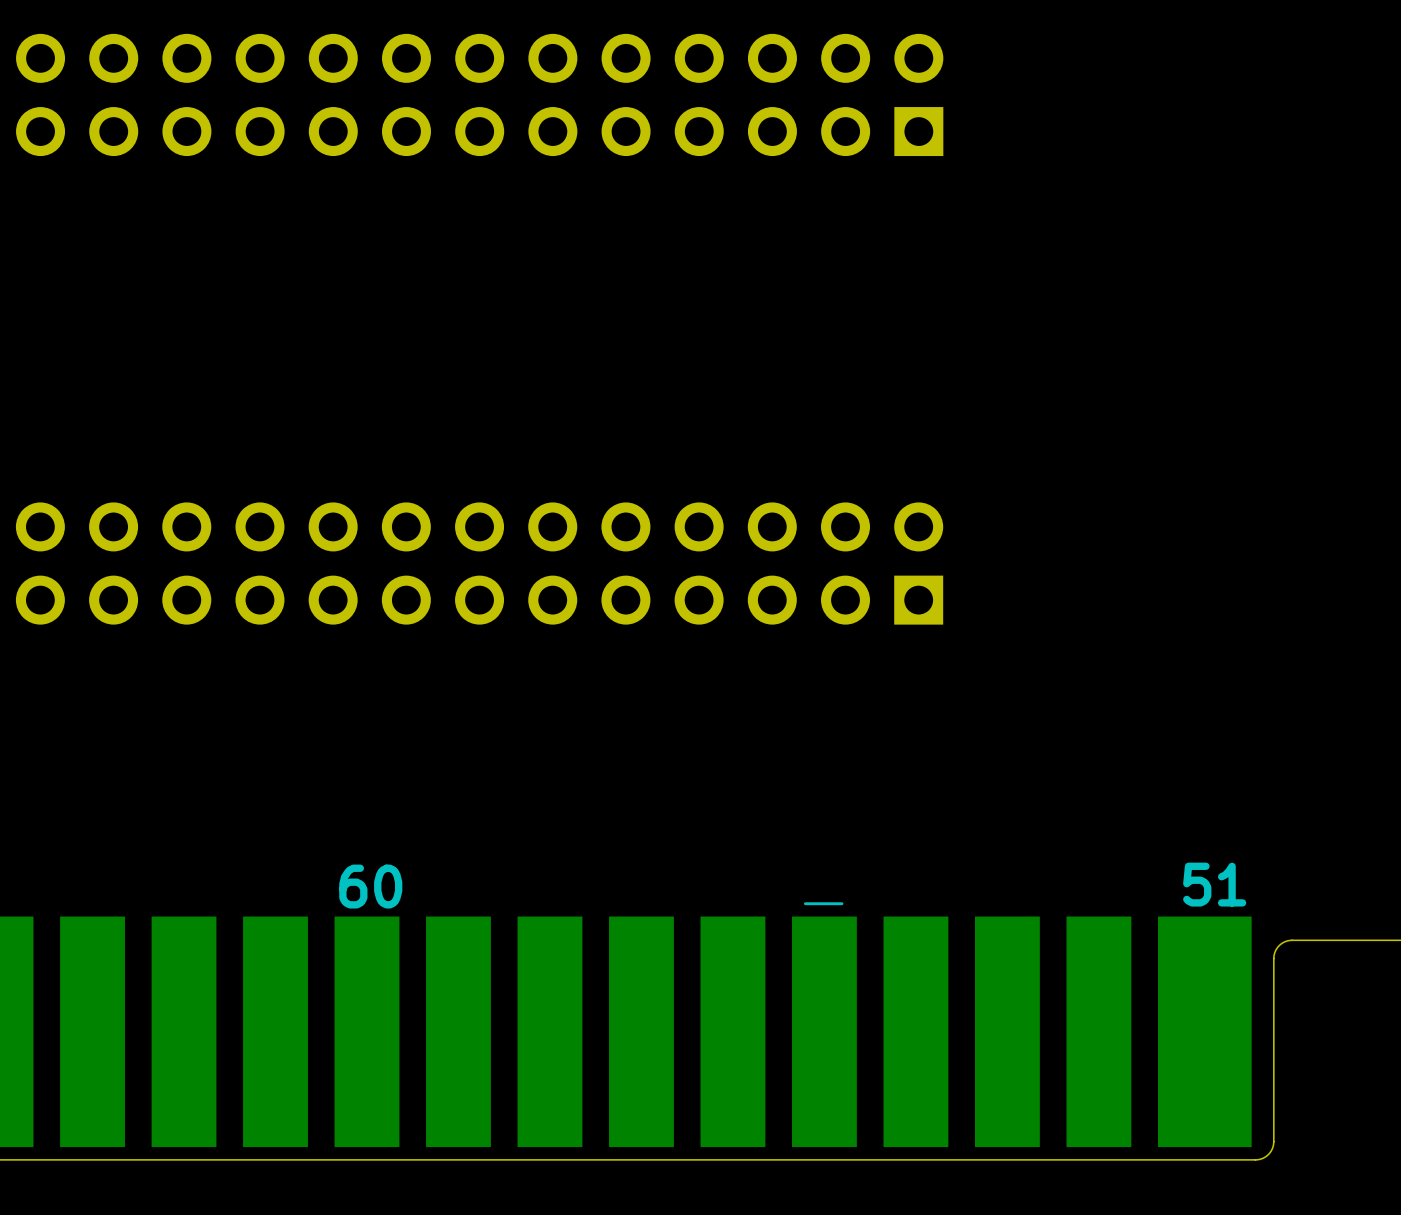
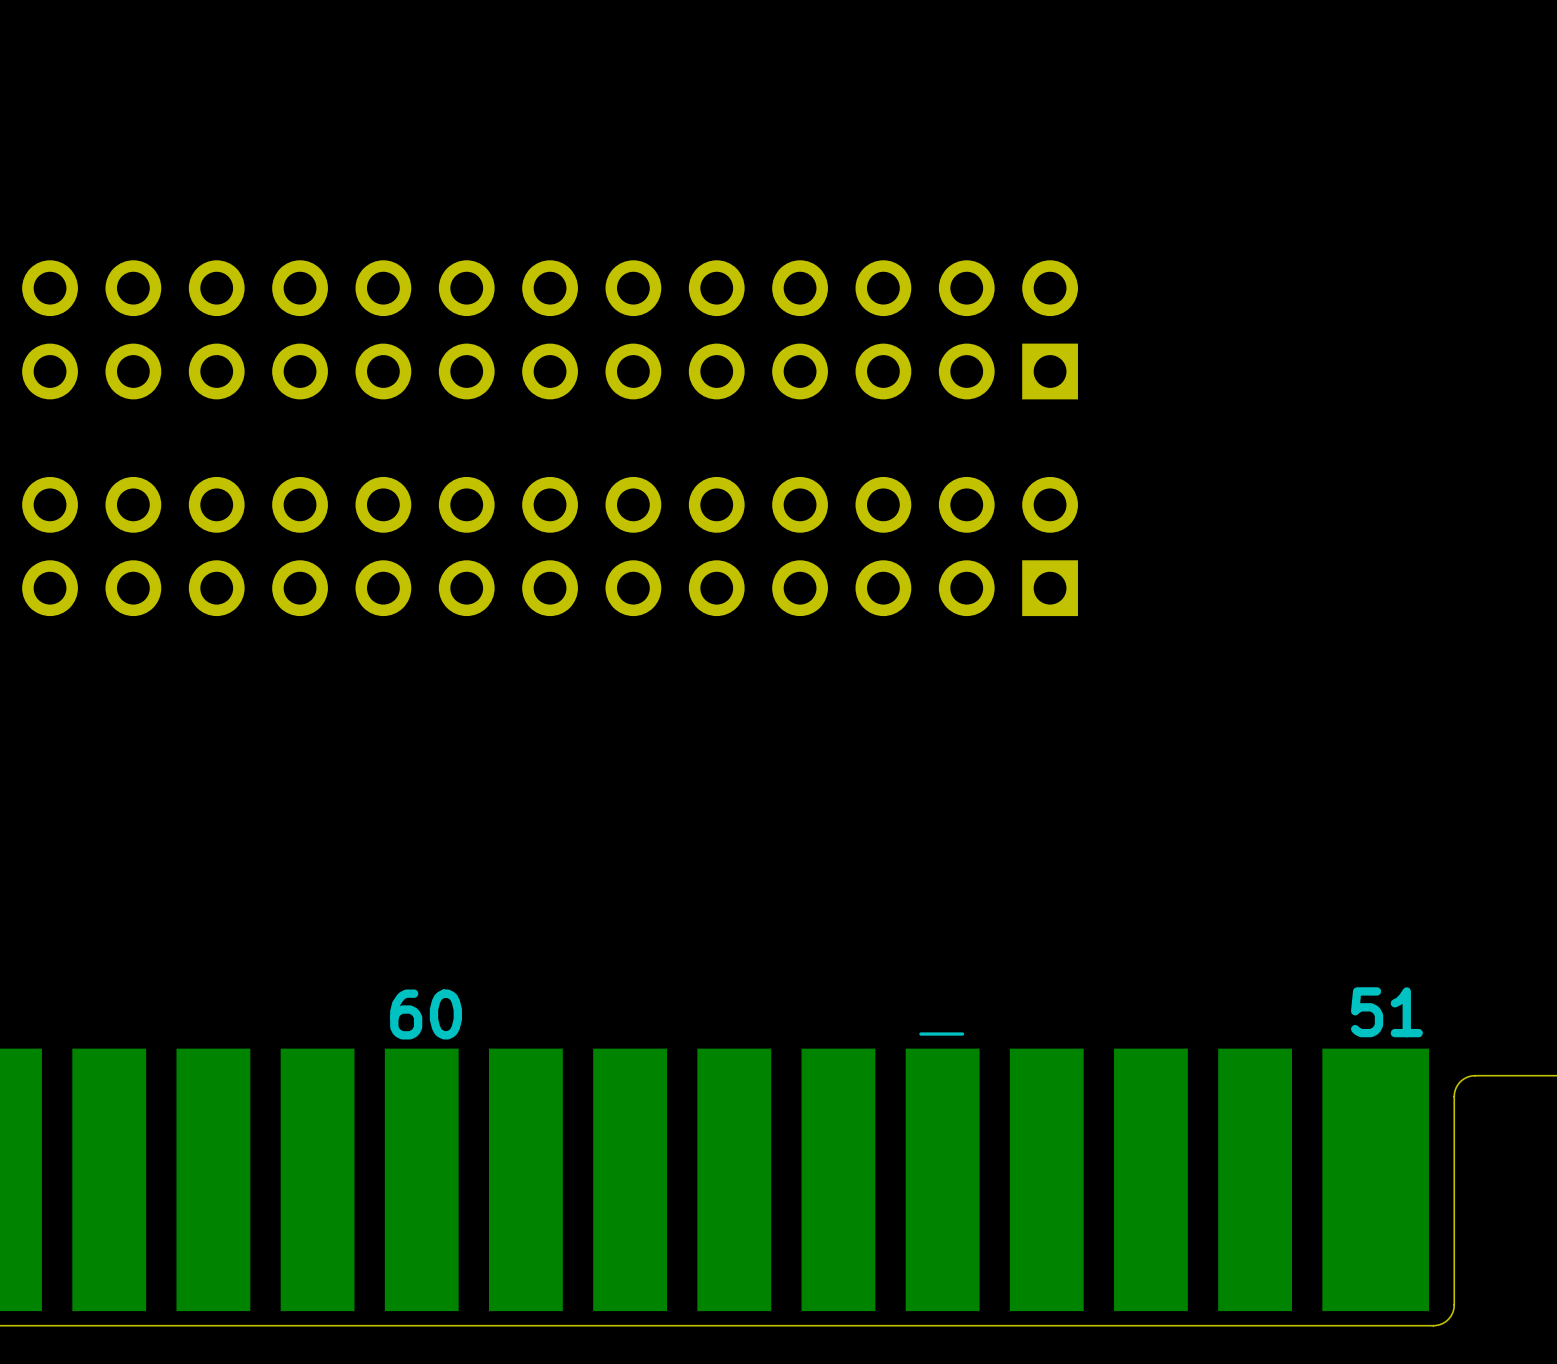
part: (479, 94) -> none
part: none -> (550, 329)
part position: (479, 563) -> (550, 546)

